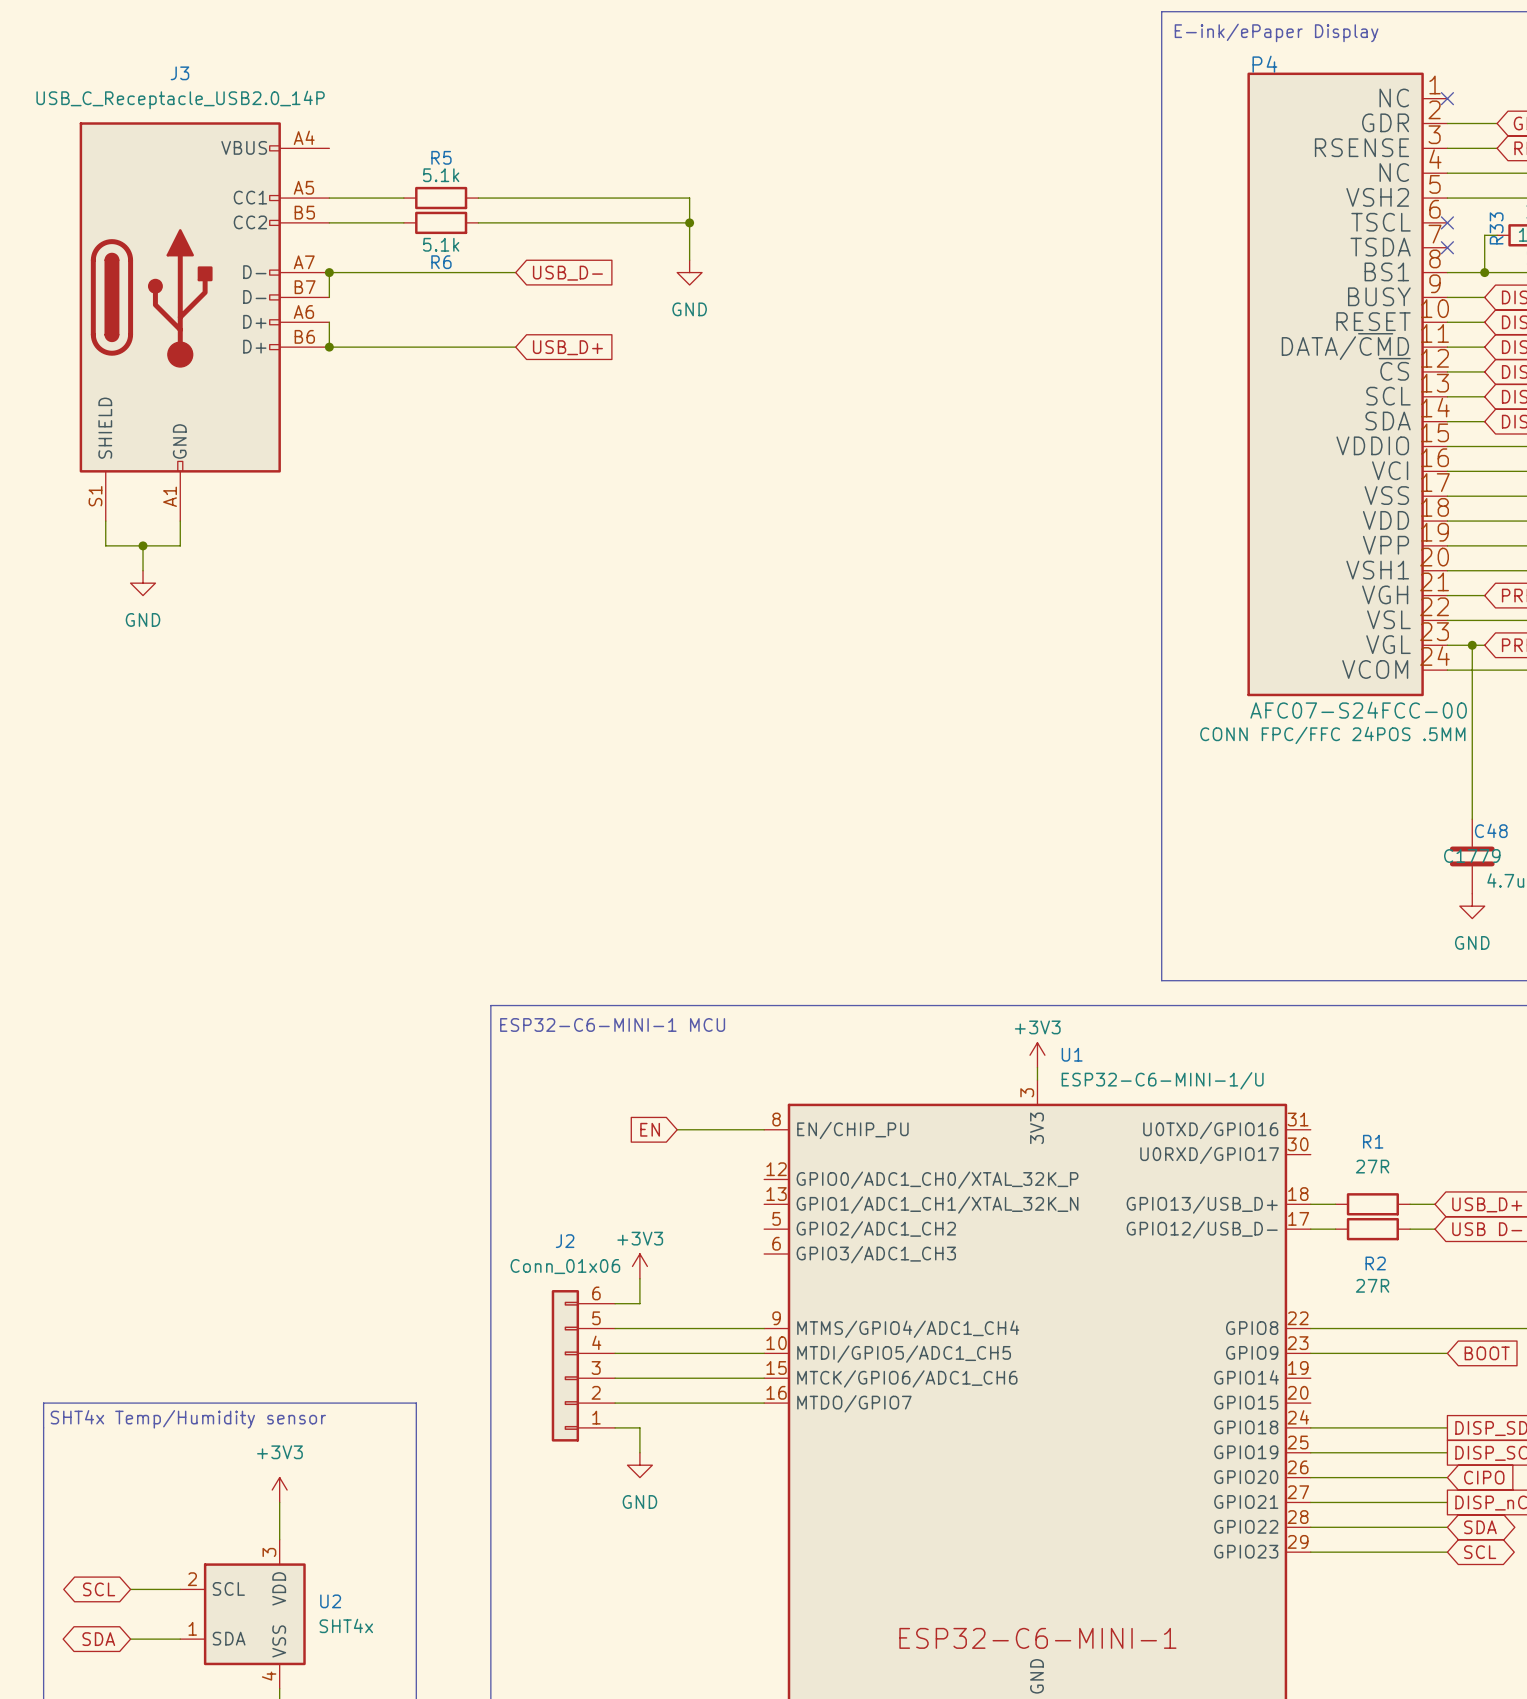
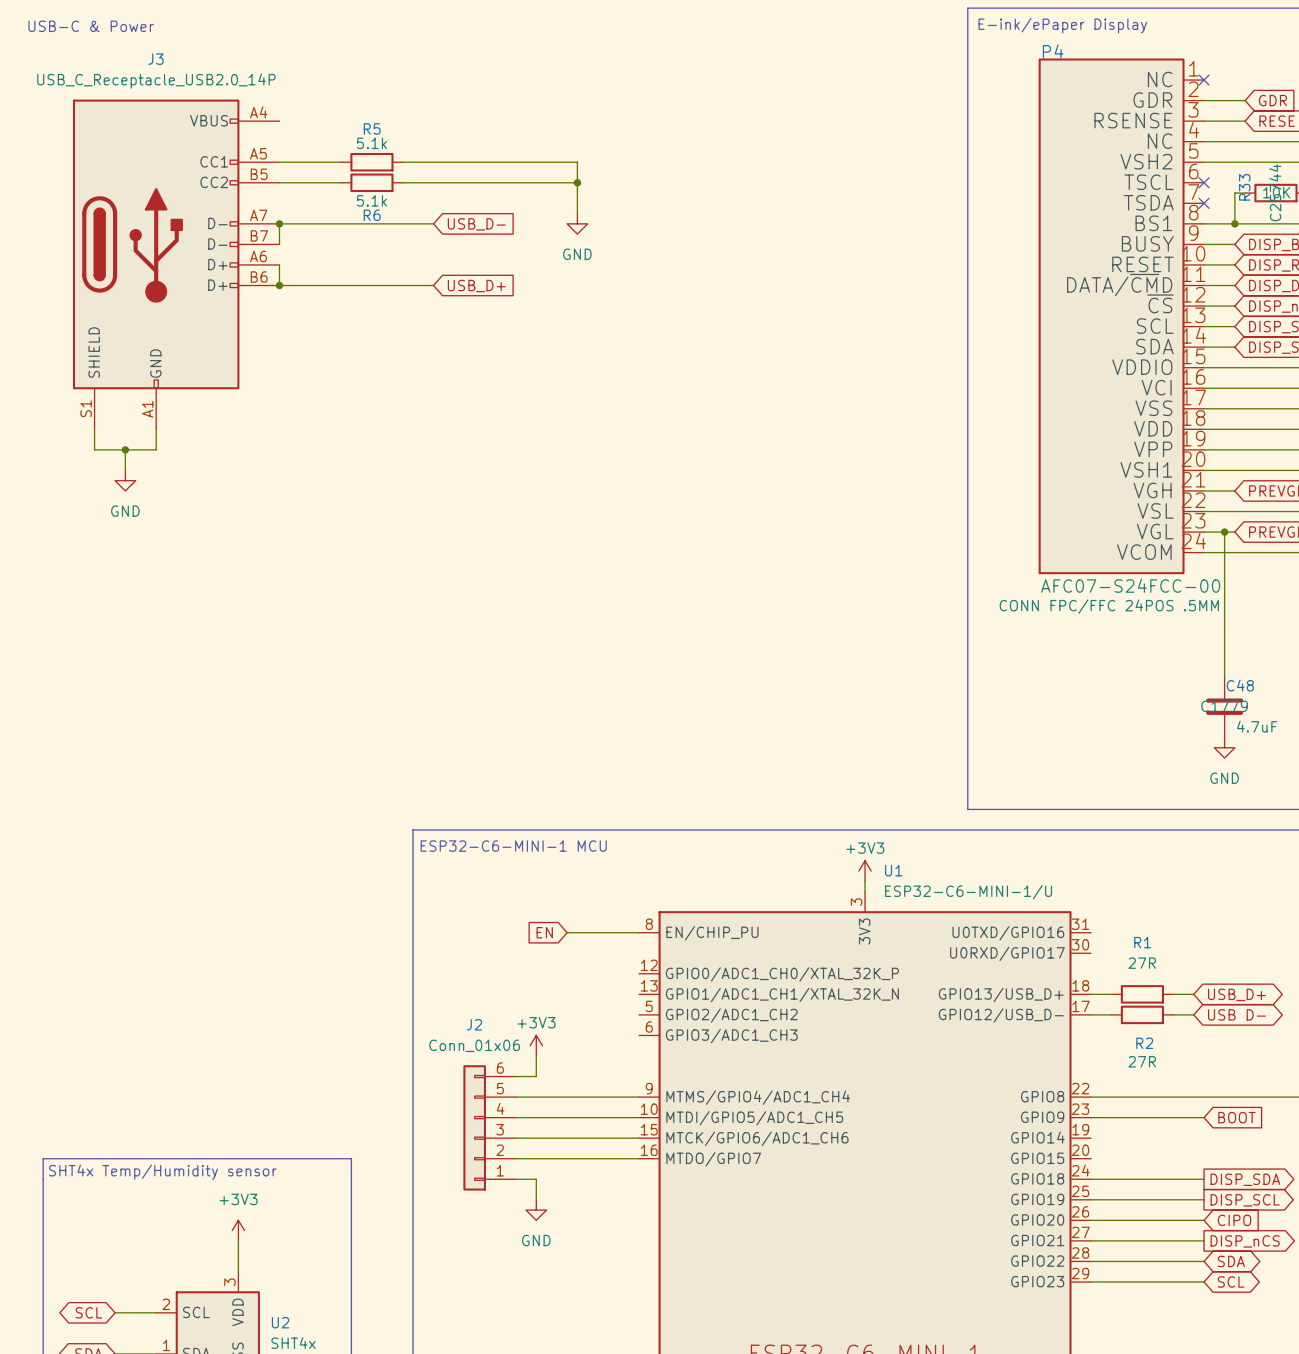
text: none -> USB-C & Power (91, 26)

